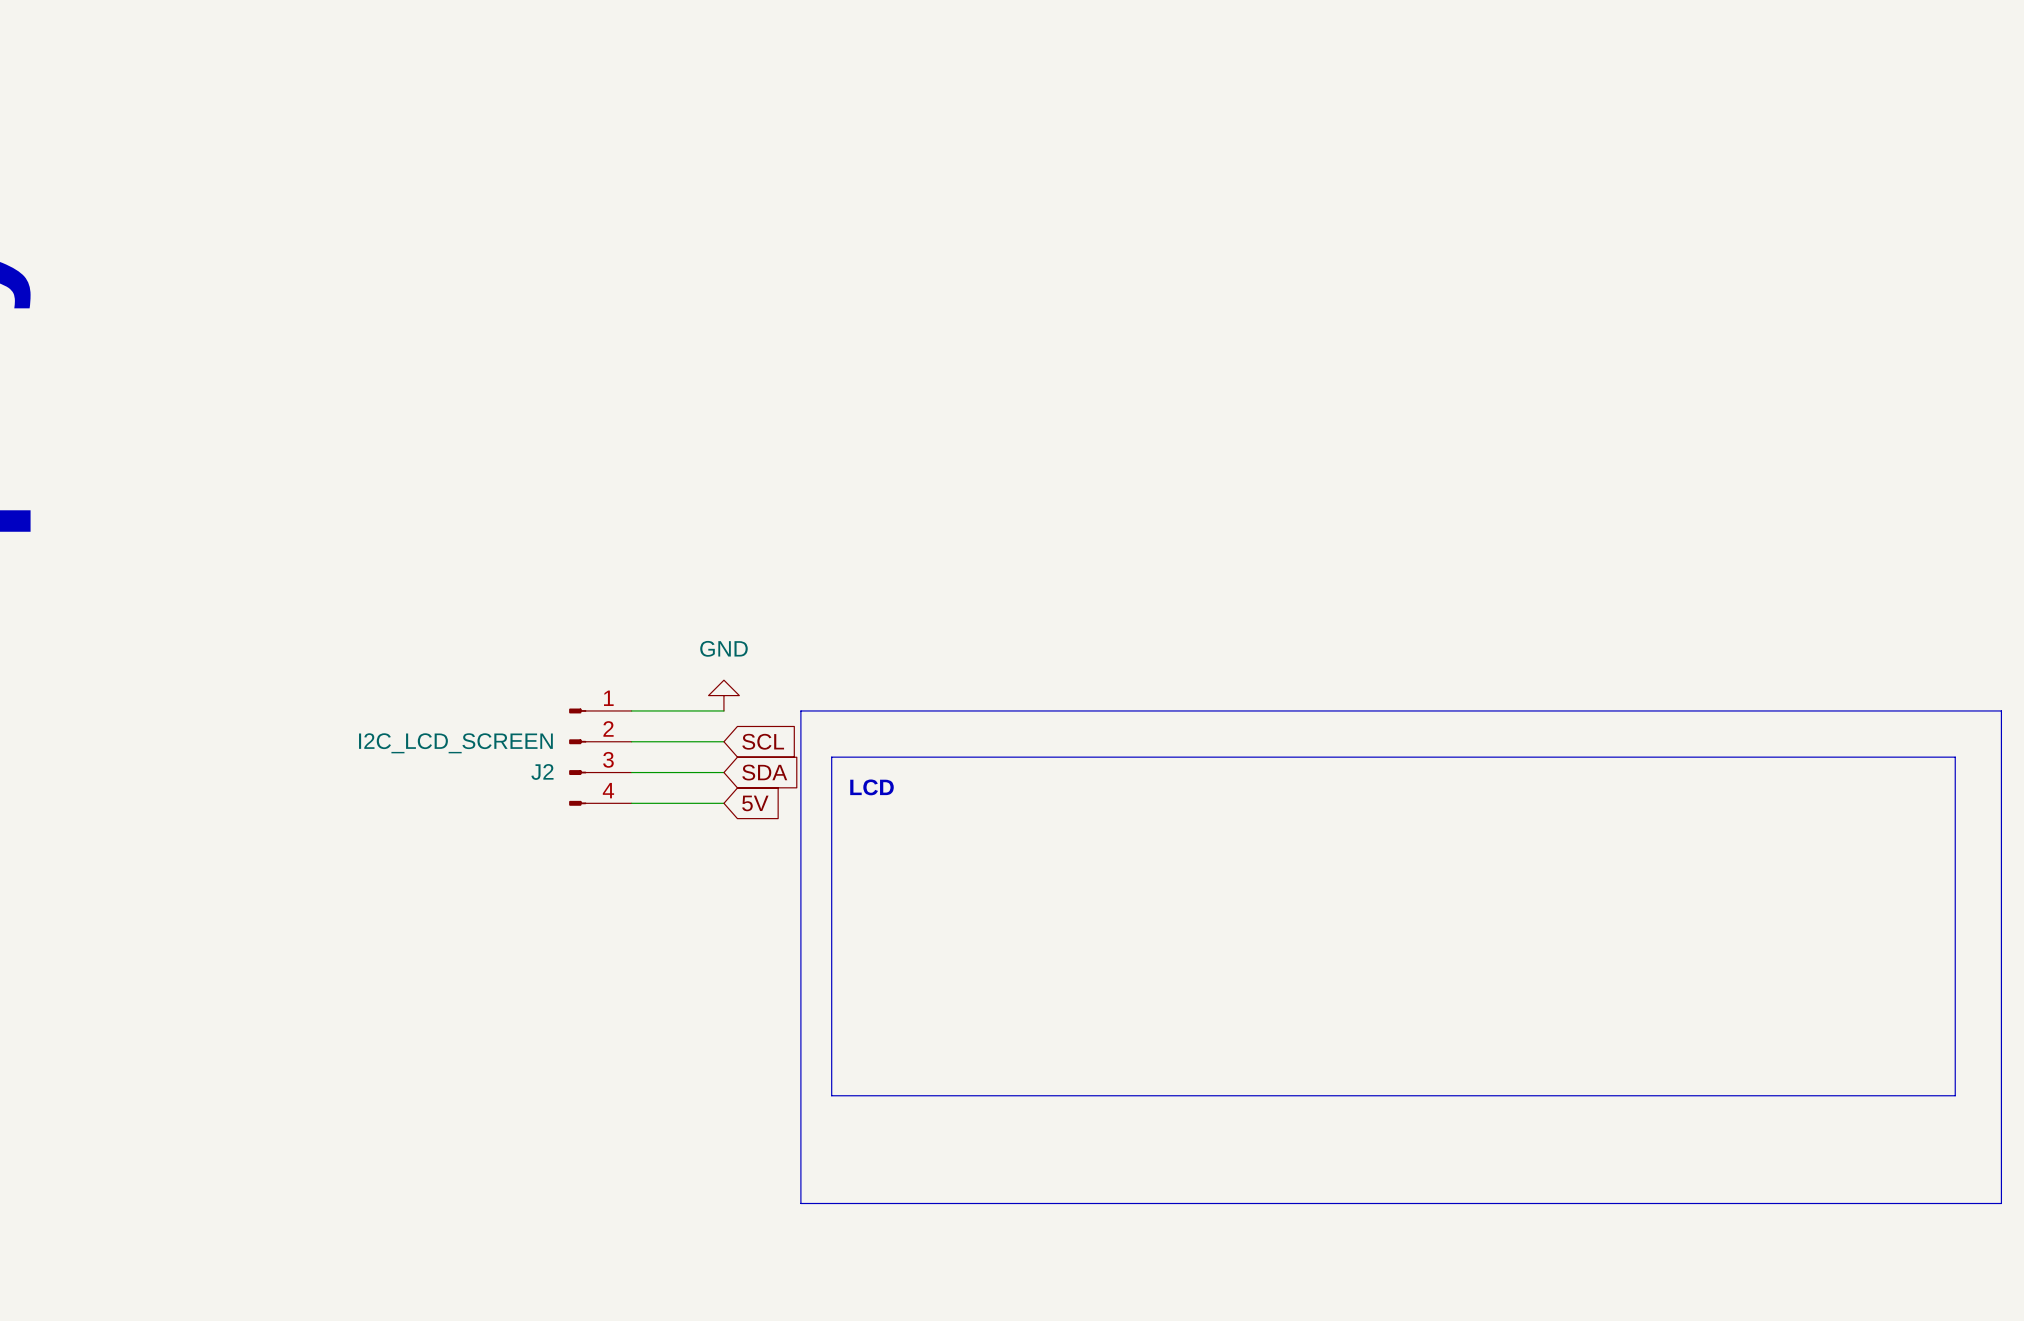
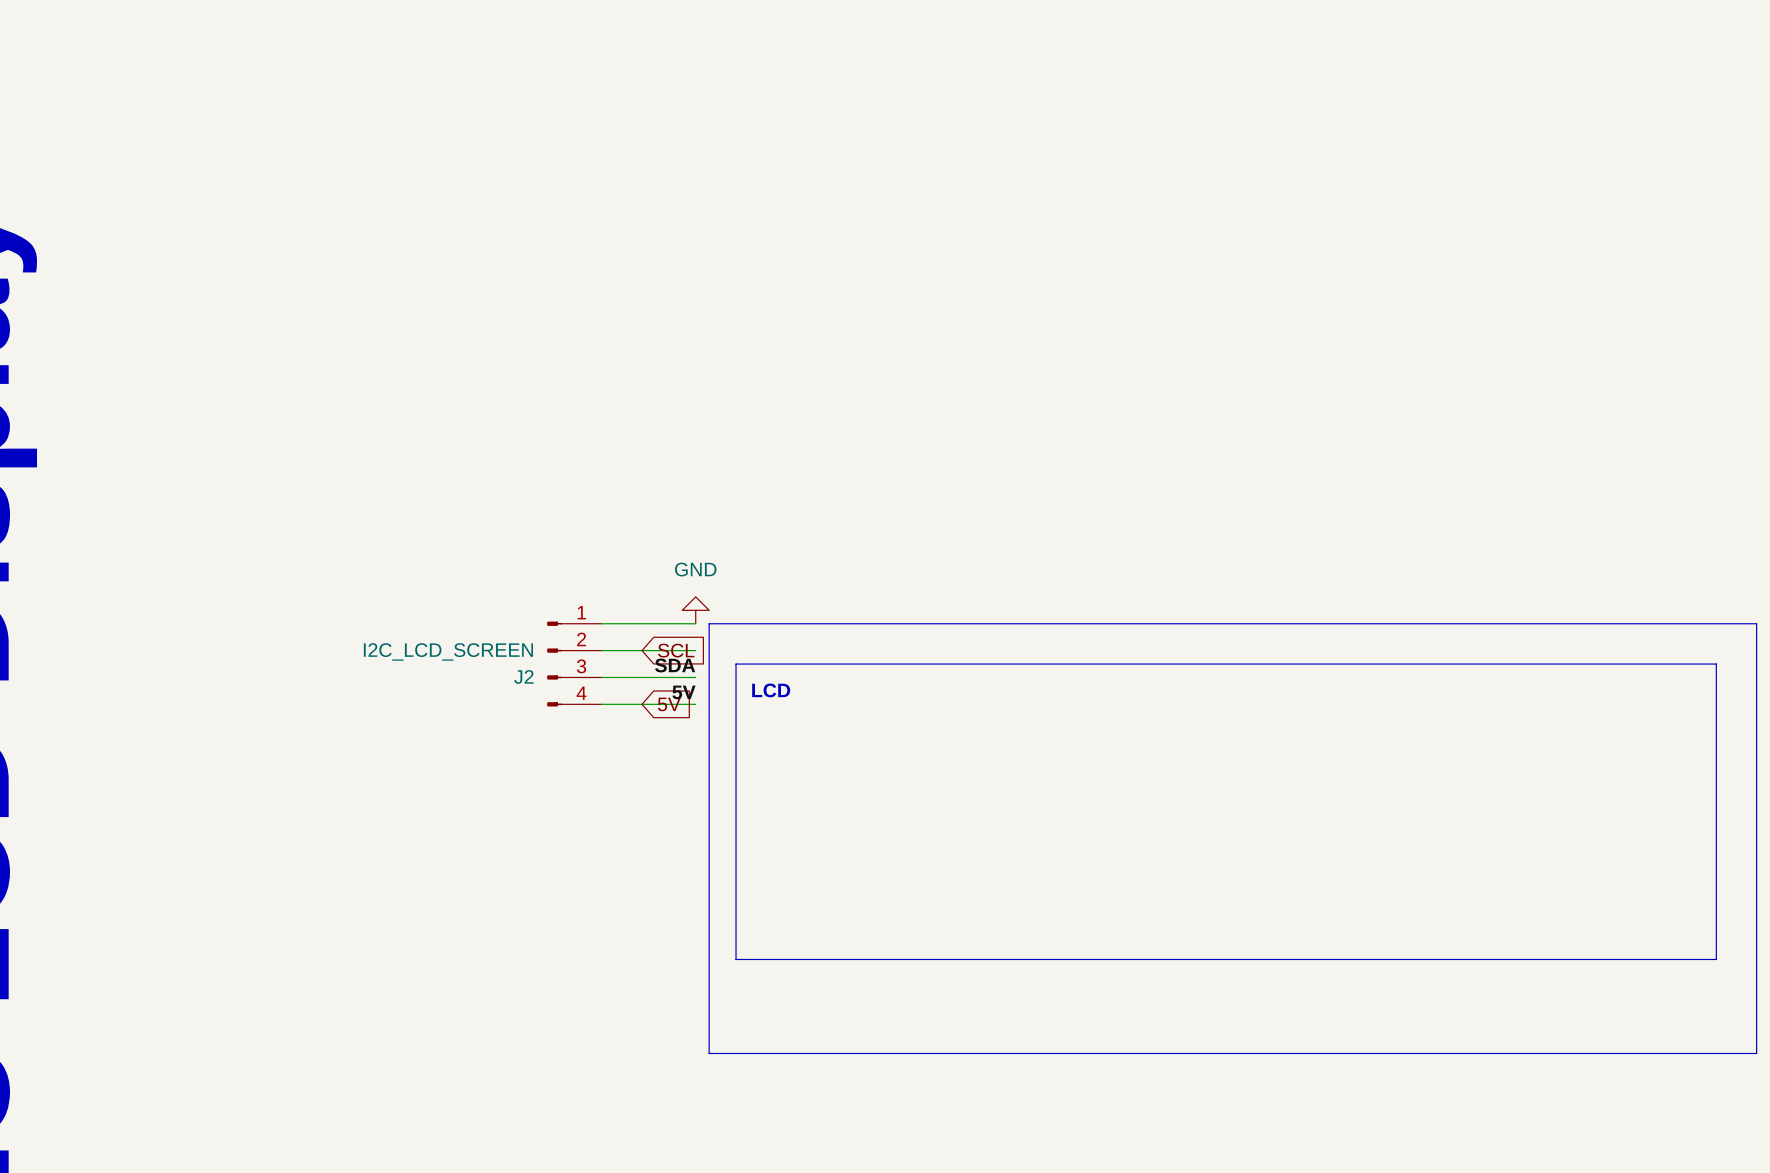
power symbol position: GND (723, 695) -> GND (695, 610)
wire: none -> (642, 623) (695, 623)
wire: none -> (642, 650) (695, 650)
J2 position: (600, 757) -> (574, 664)
label: none -> SDA (675, 665)
wire: none -> (642, 677) (695, 677)
global label: SDA (764, 772) -> none
label: none -> 5V (684, 692)
wire: none -> (642, 704) (695, 704)

